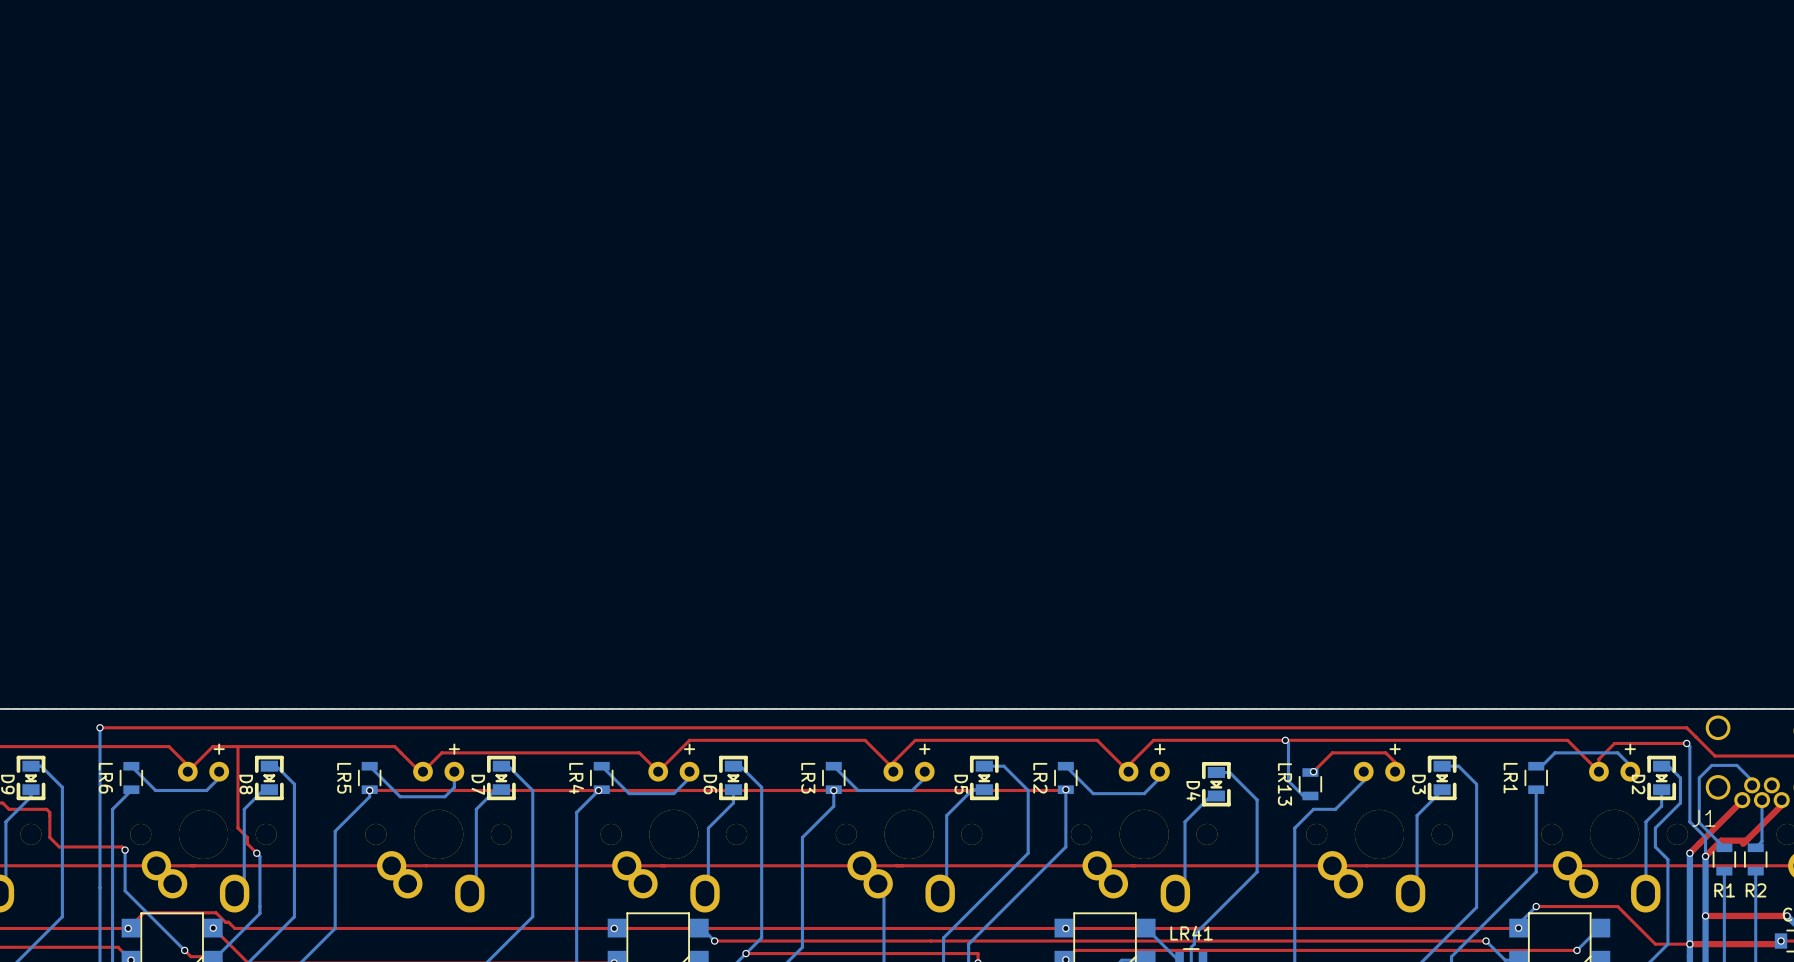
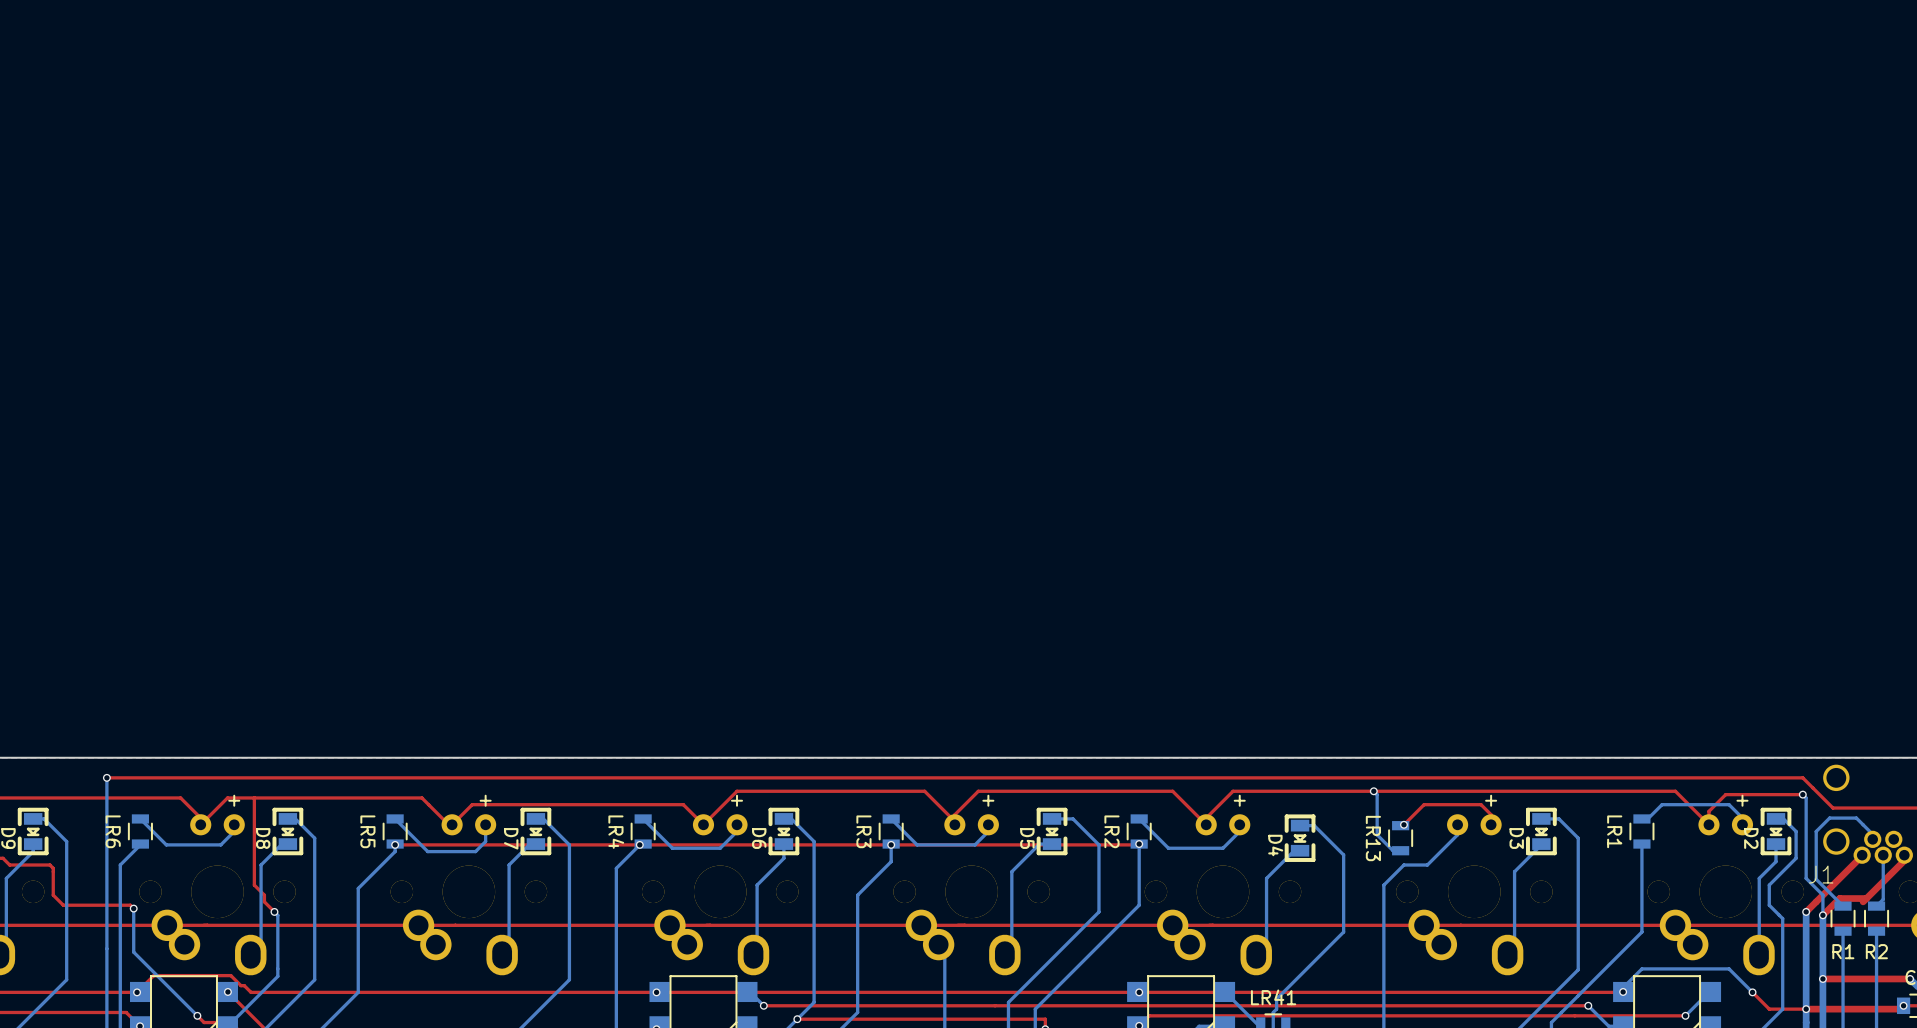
bottom track: none -> (1641, 968) (1729, 968) (1752, 992)
top track: (1536, 906) (1617, 906) (1639, 928) -> none
via: (1536, 906) -> none
via: none -> (1752, 992)

